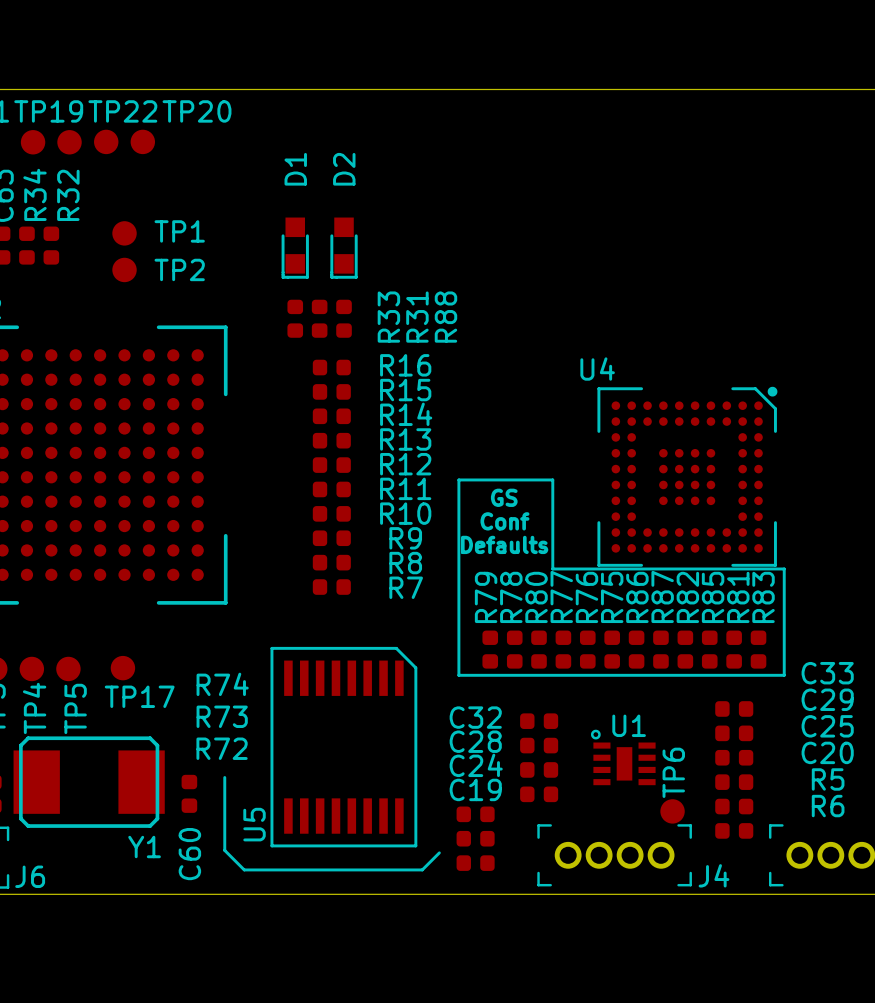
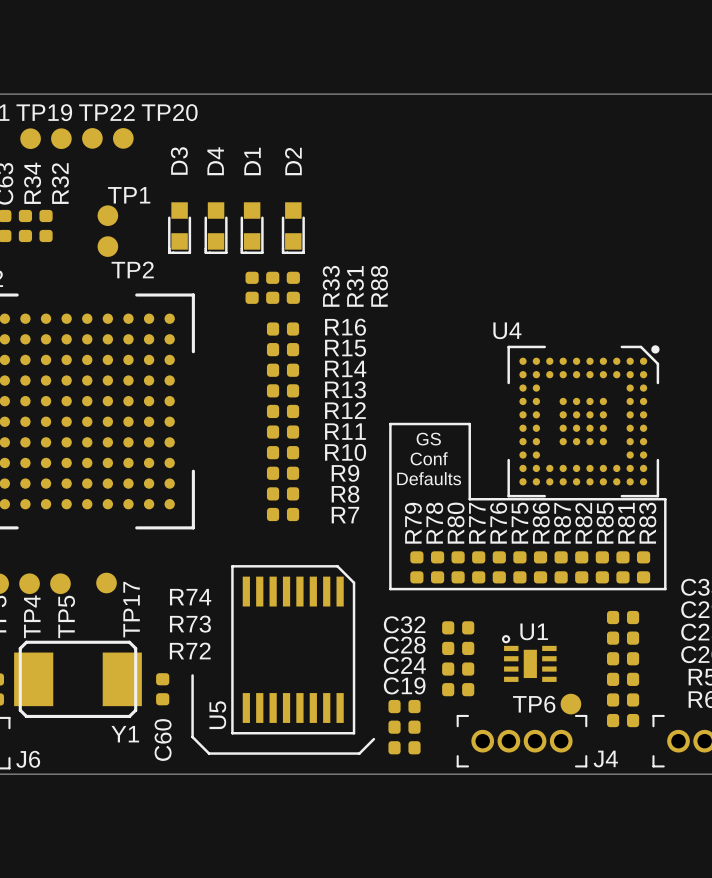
TP1 name position: TP1 (179, 231) -> TP1 (129, 195)
D3: none -> (179, 228)
D4: none -> (216, 228)
TP2 name position: TP2 (179, 269) -> TP2 (132, 269)
TP17 name rotation: 0° (139, 696) -> 90° counterclockwise (131, 609)
TP6 name rotation: 0° (673, 772) -> 90° clockwise (534, 704)

